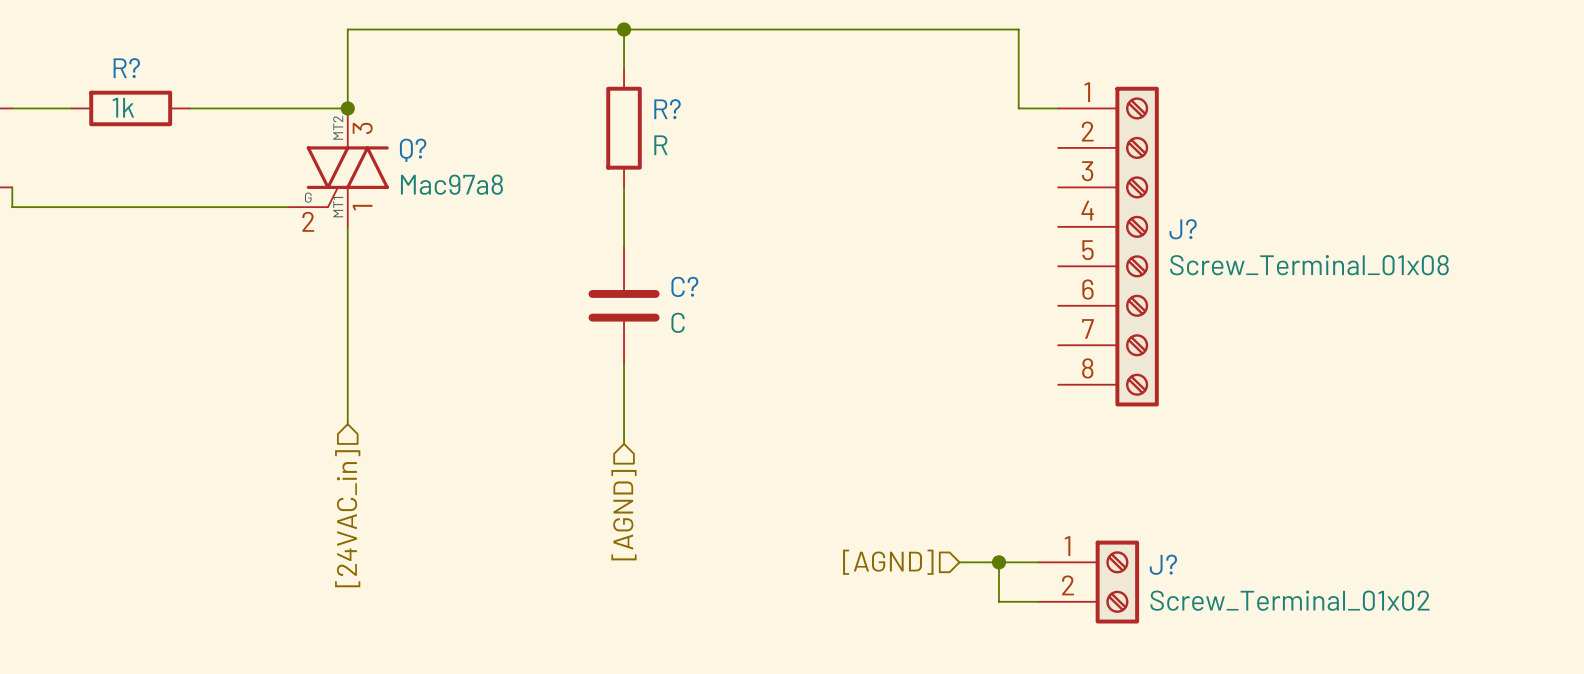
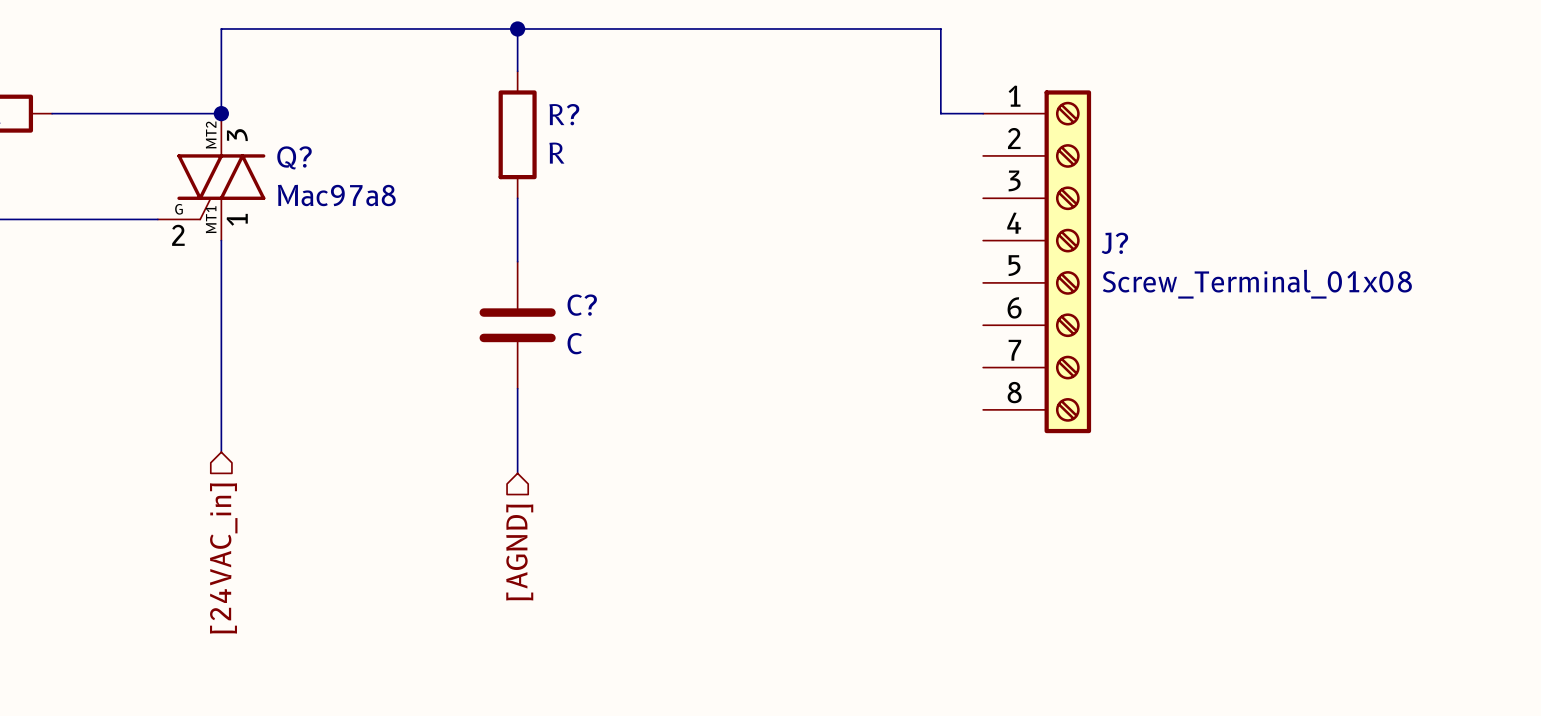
hierarchical label: [AGND] (888, 562) -> none
wire: (959, 562) (1038, 562) -> none
wire: (998, 562) (998, 601) (1038, 601) -> none
junction: (998, 562) -> none
J?: Screw_Terminal_01x02 (1088, 582) -> none

